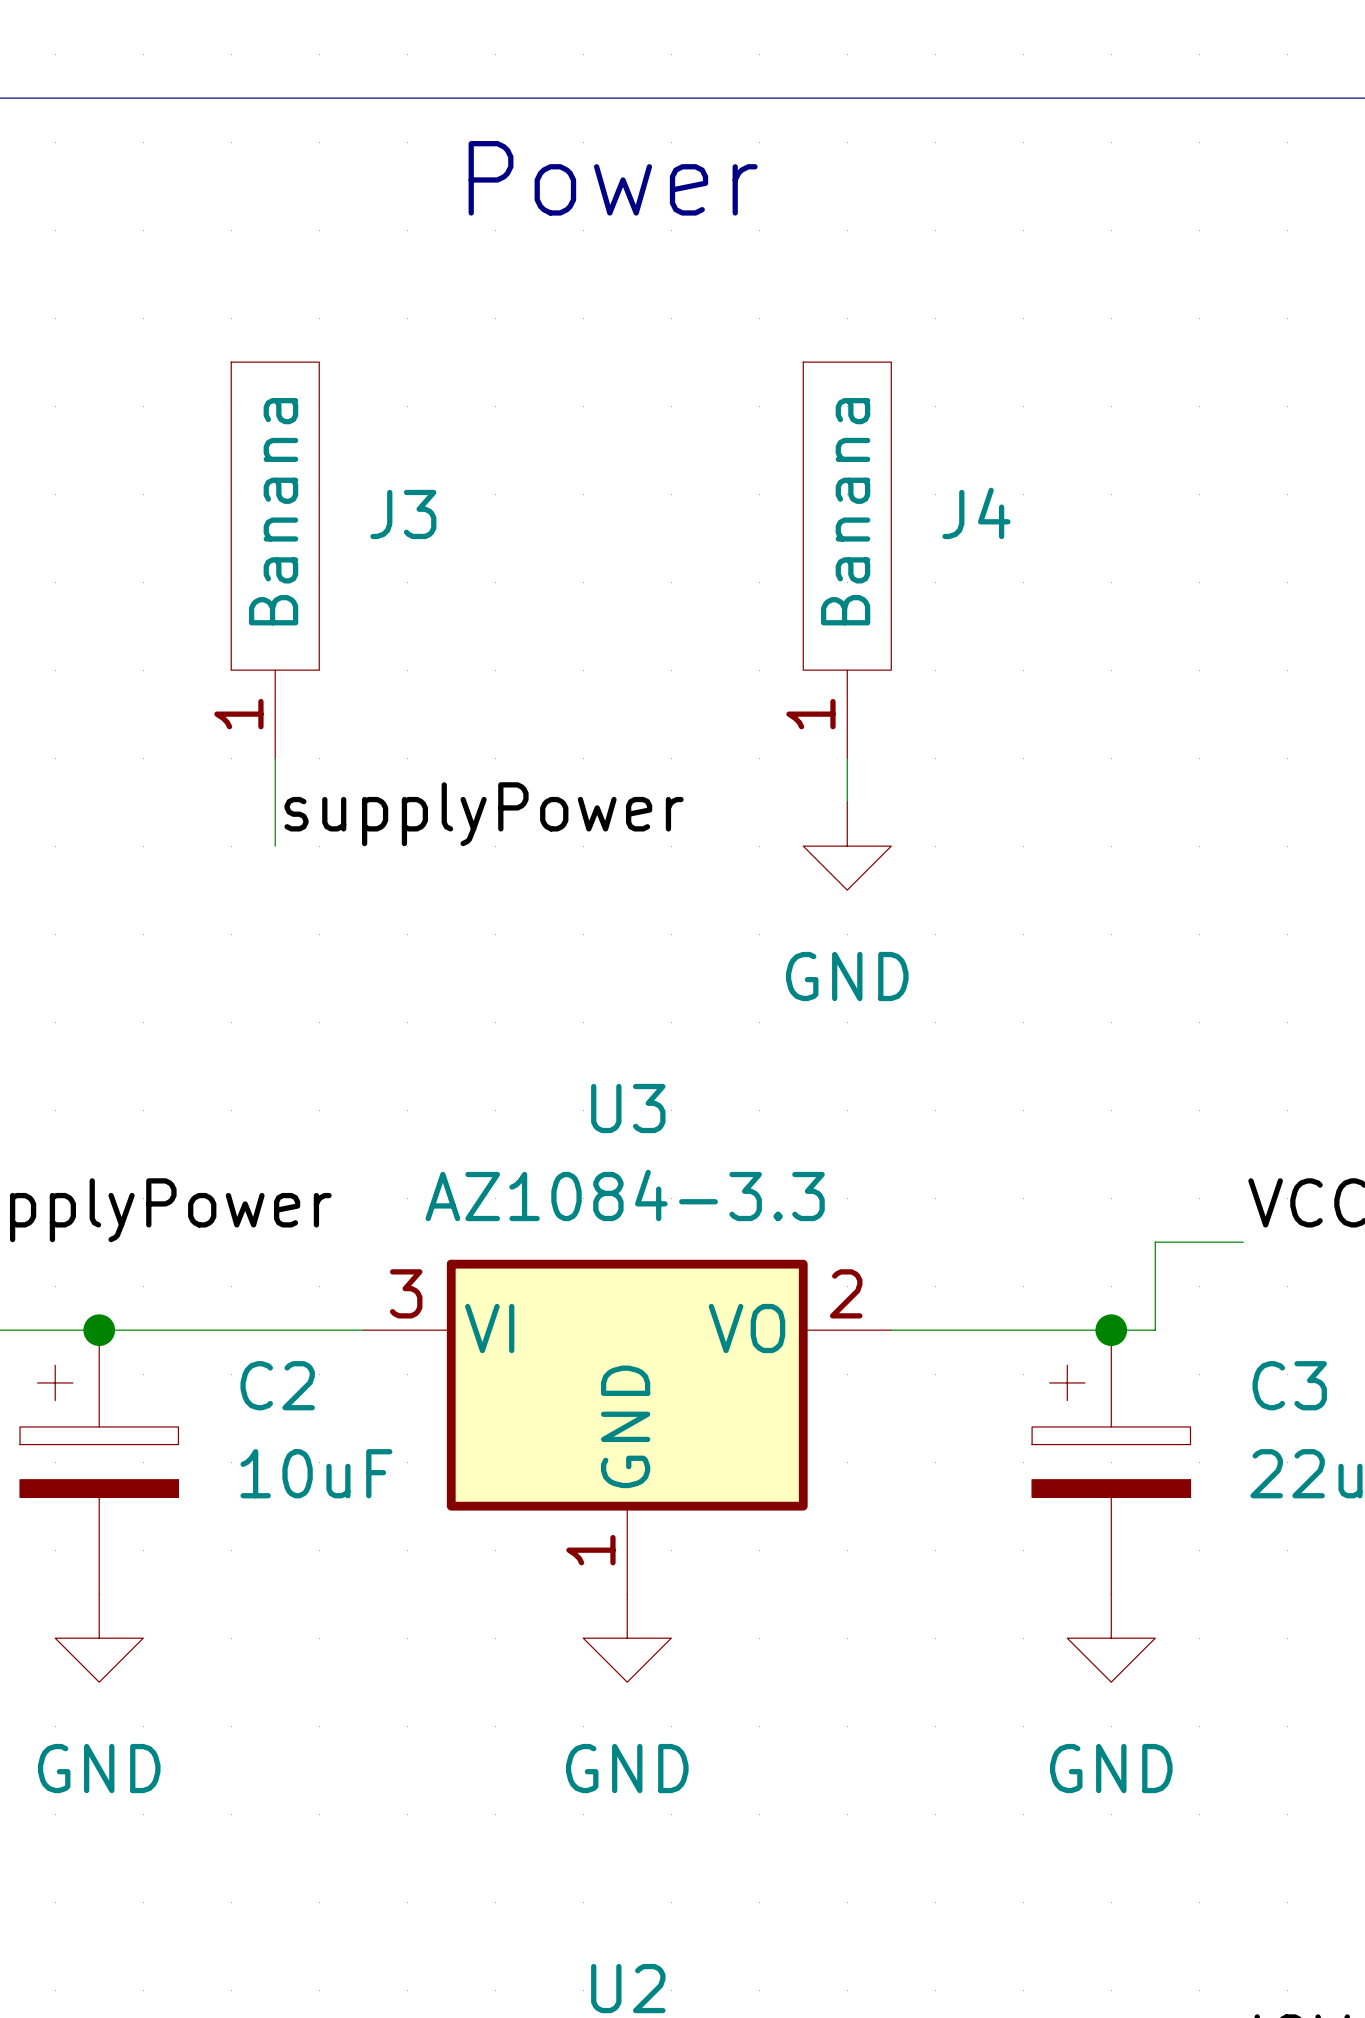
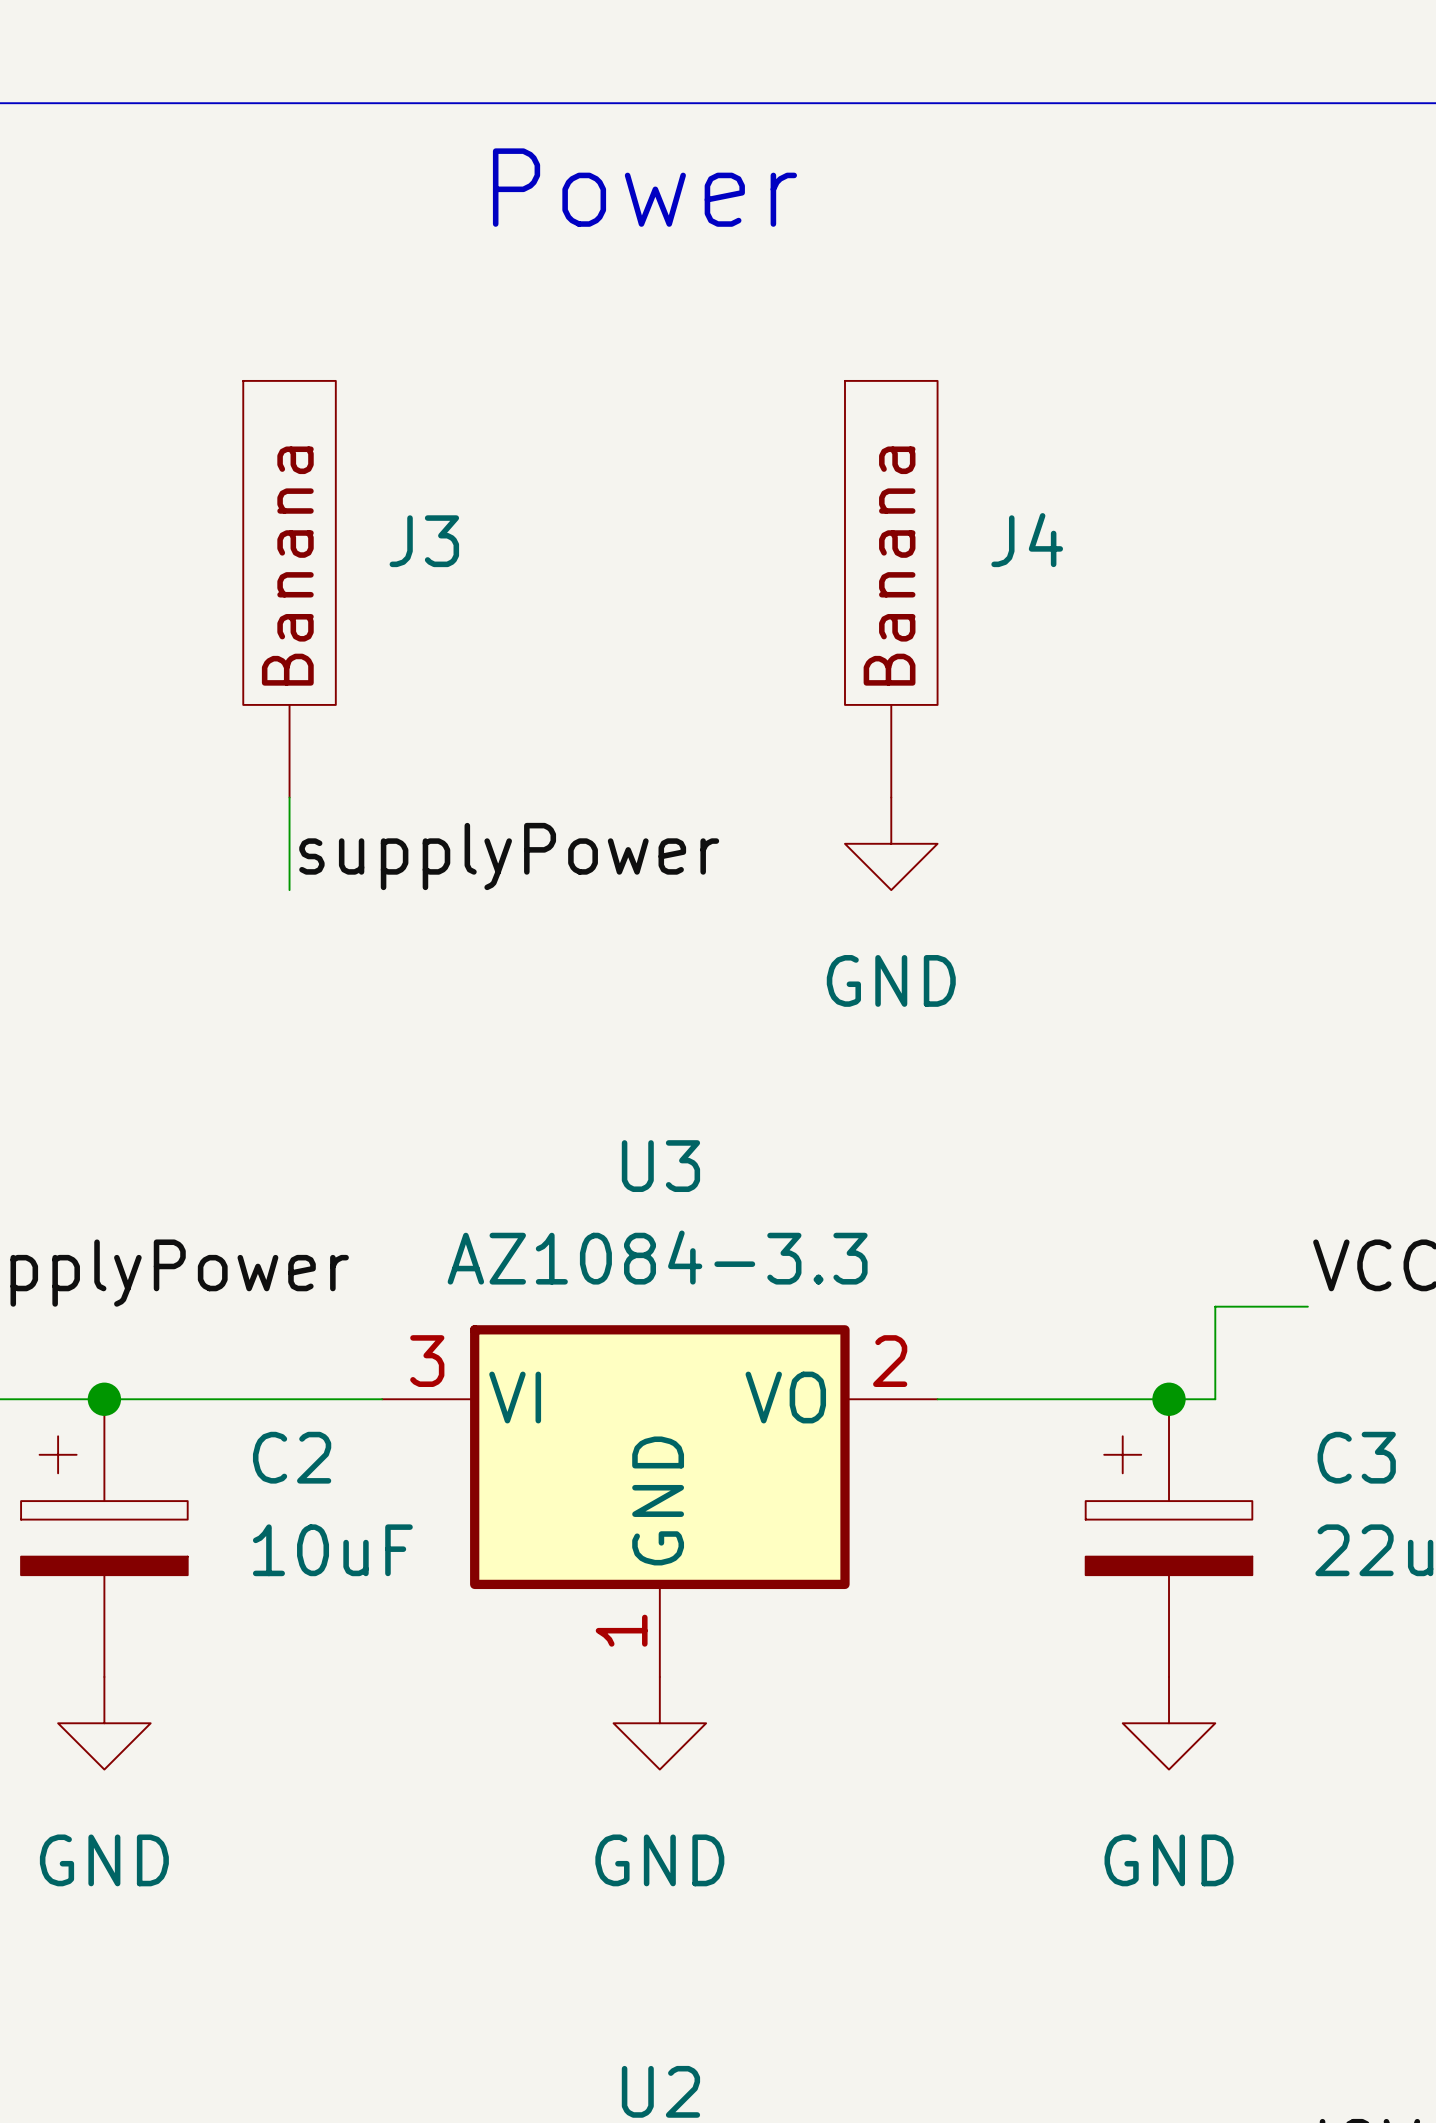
J3 value: Banana (273, 511) -> none
J4 value: Banana (845, 511) -> none
J3 text: none -> Banana (287, 566)
J4 text: none -> Banana (889, 566)
J3 pin number: 1 (238, 714) -> none
J4 pin number: 1 (810, 714) -> none
power symbol position: GND (847, 846) -> GND (891, 843)

